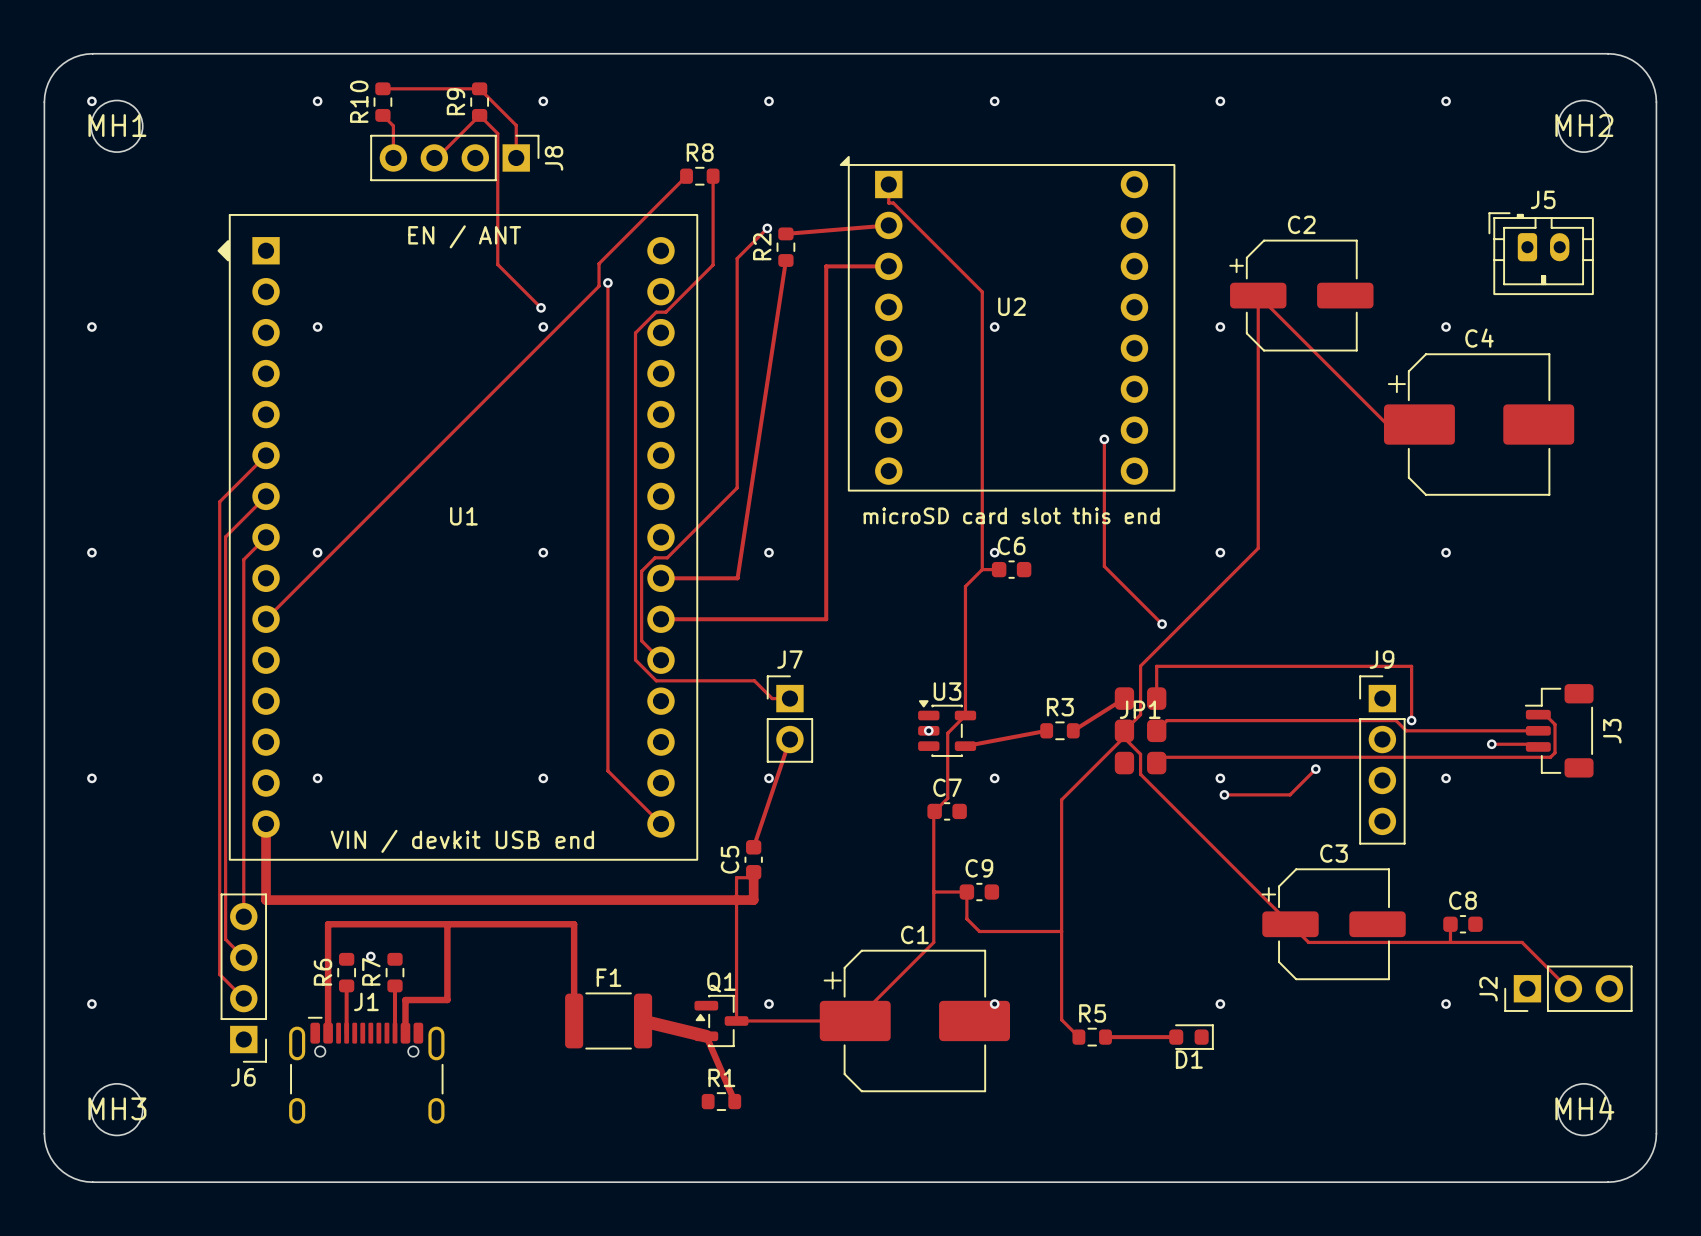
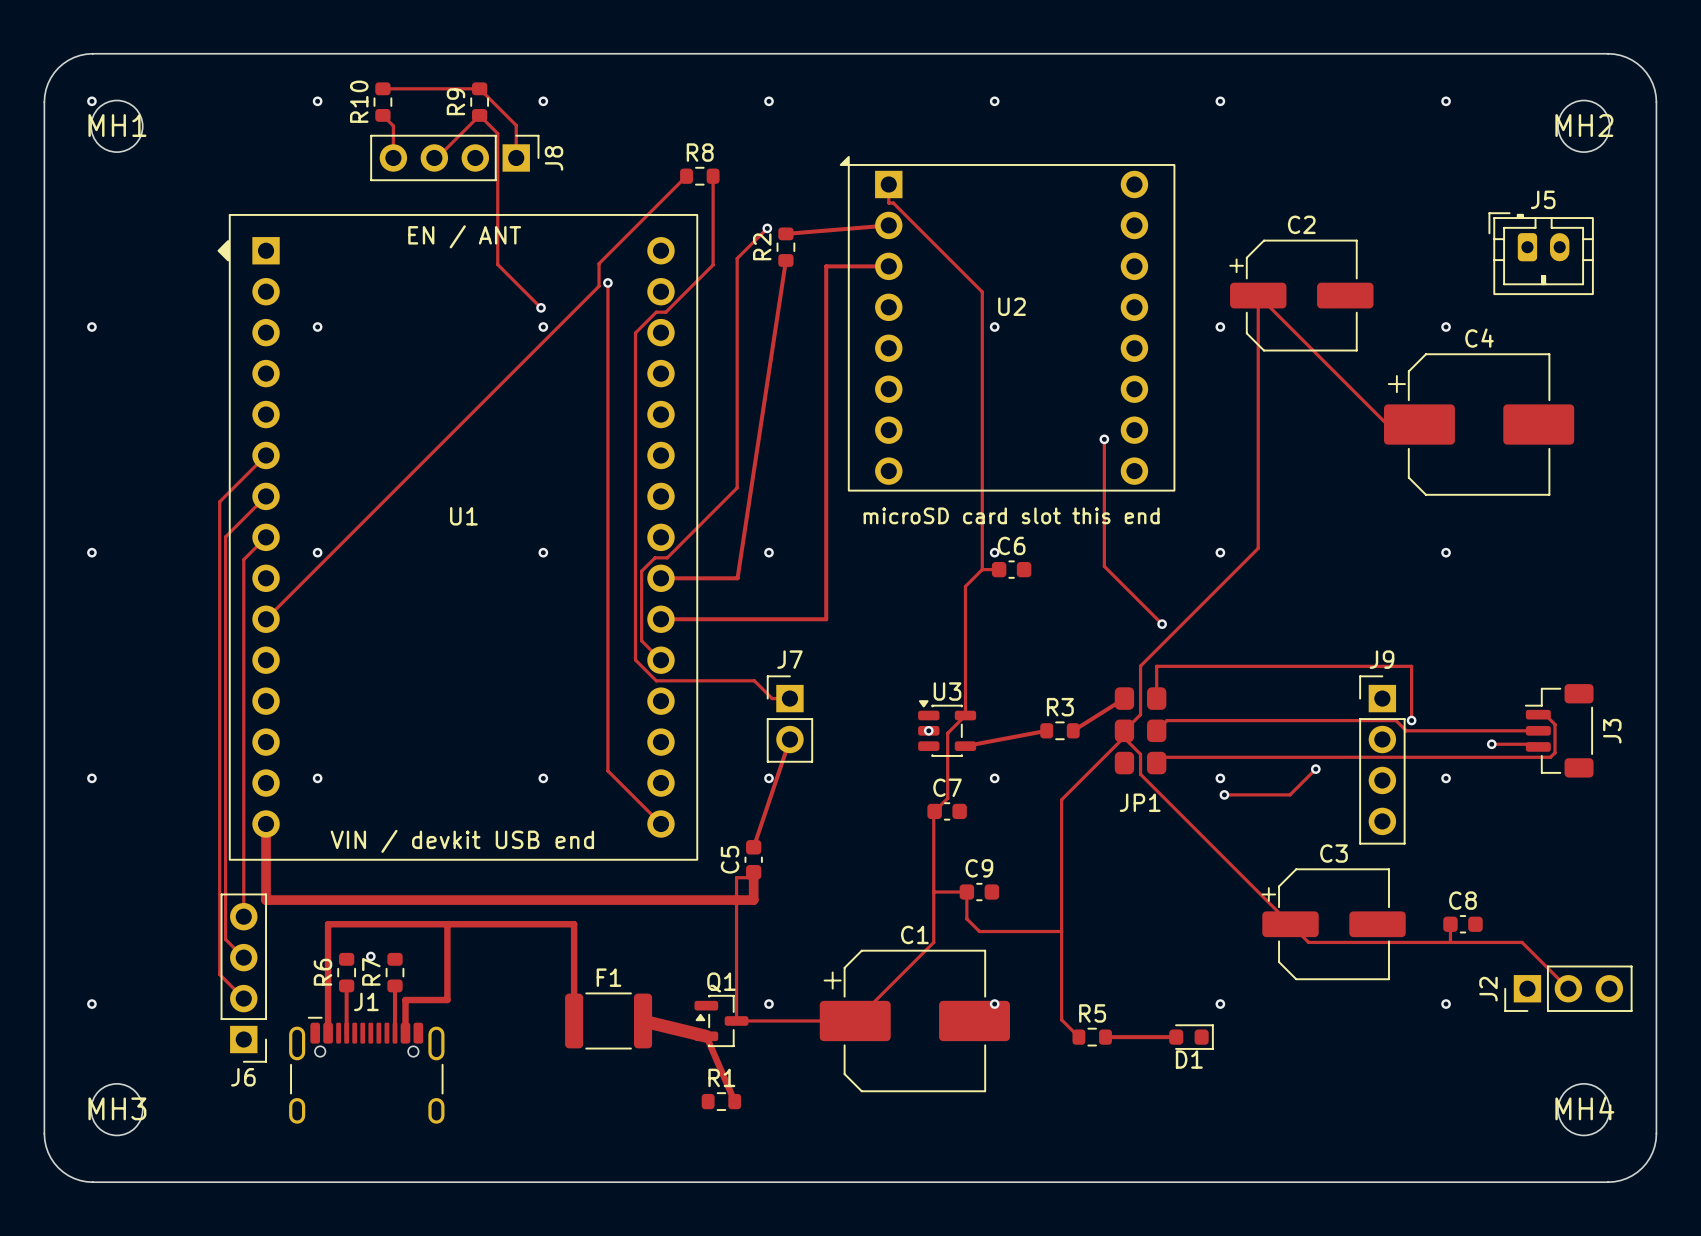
JP1 name position: JP1 (1140, 709) -> JP1 (1140, 802)

